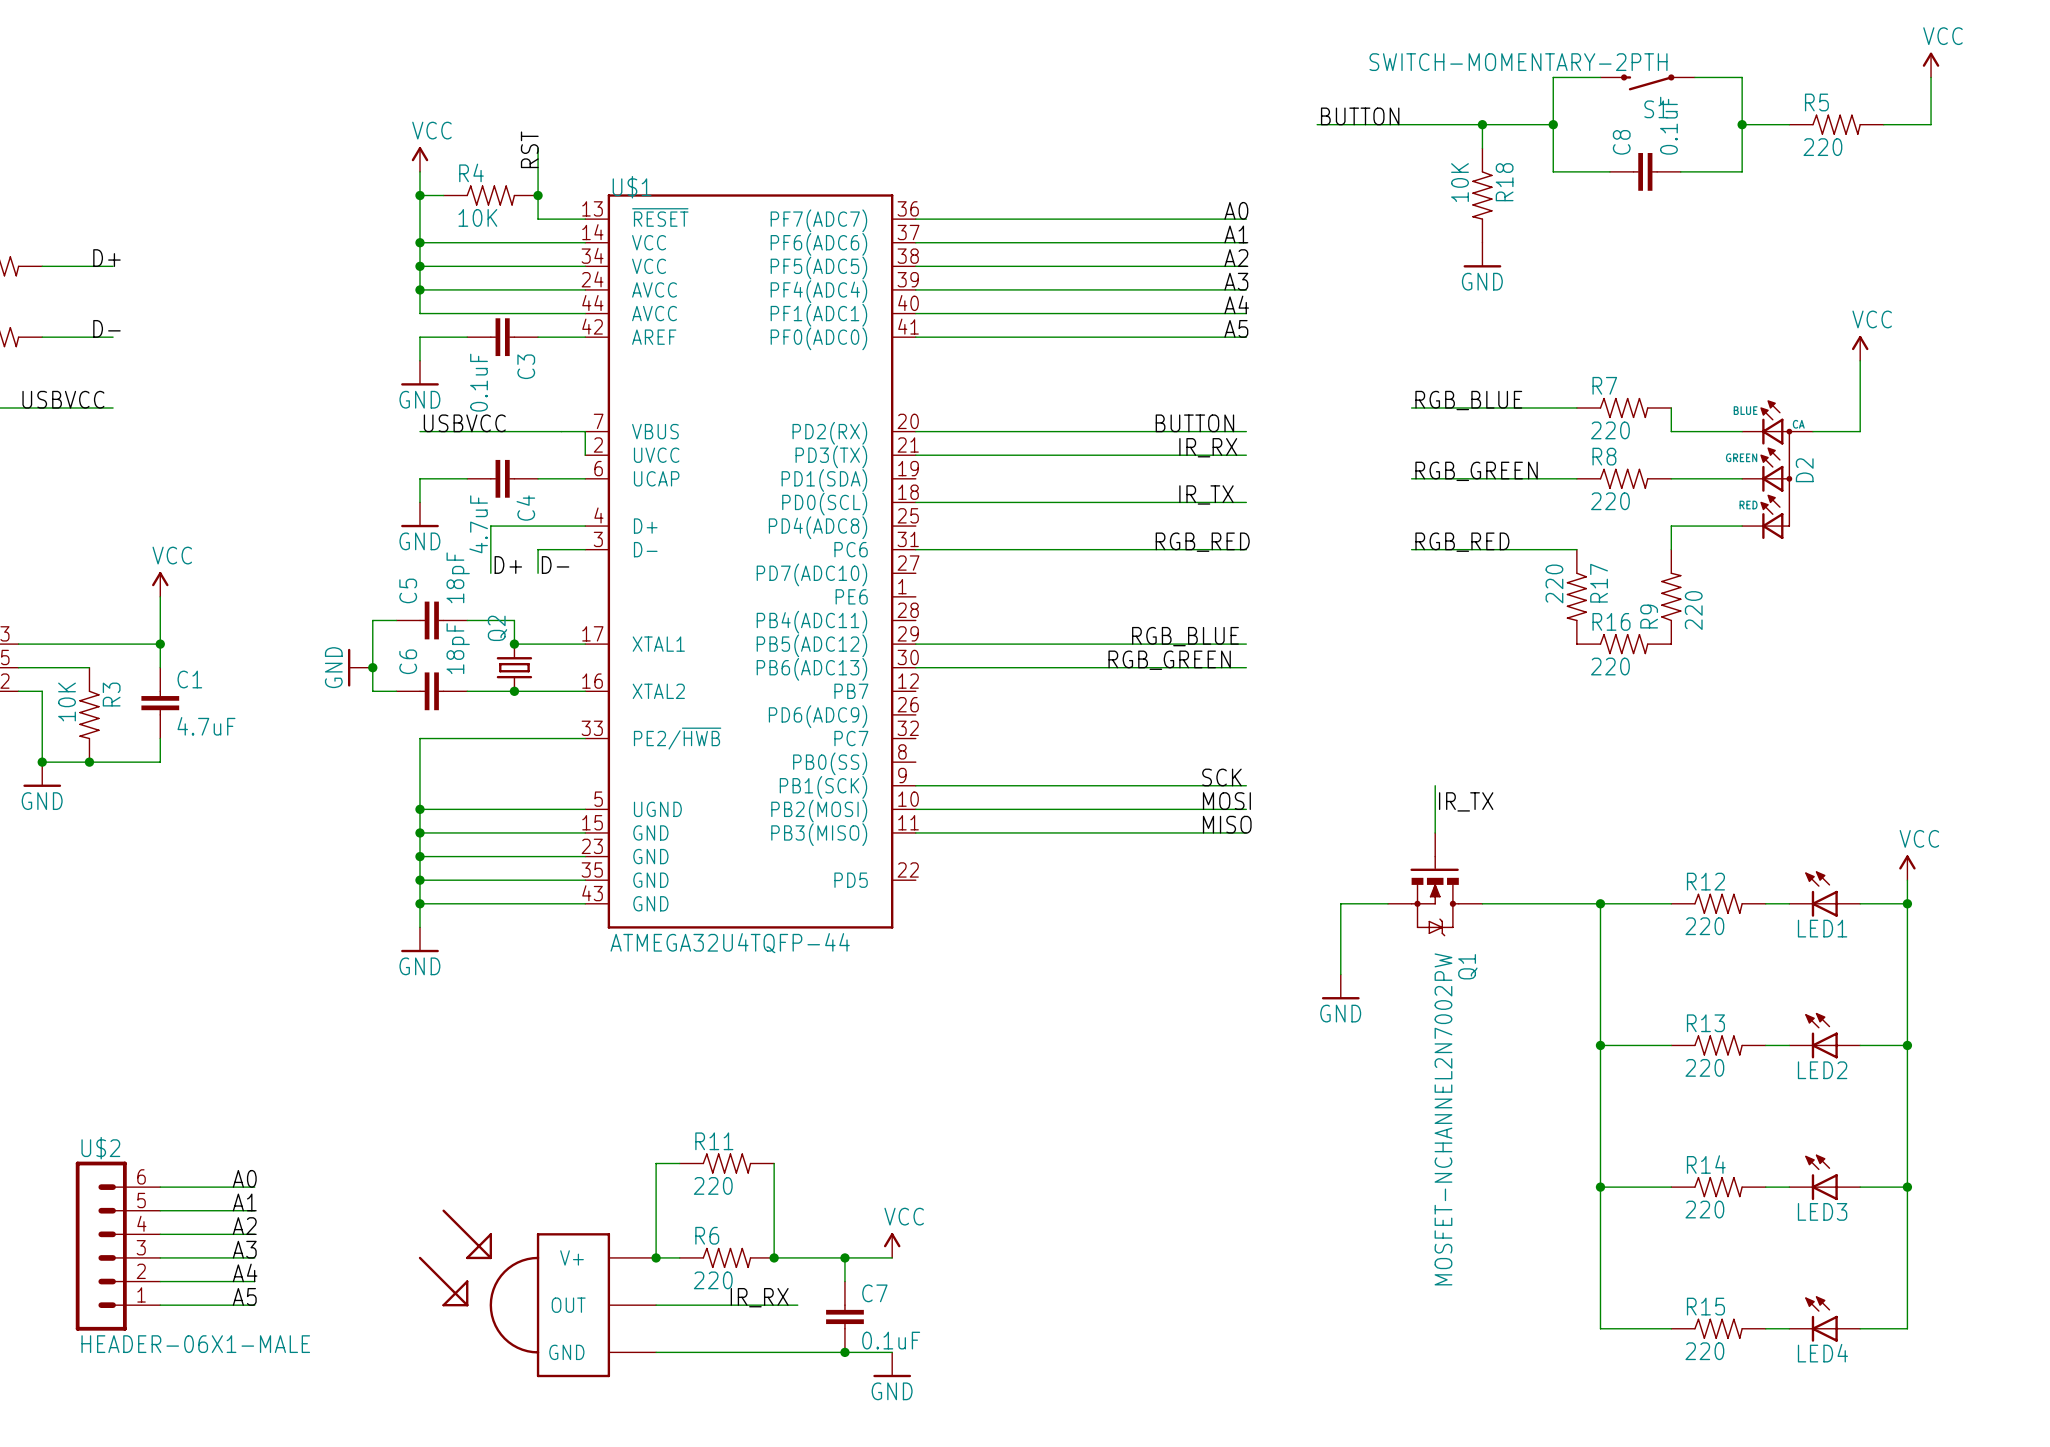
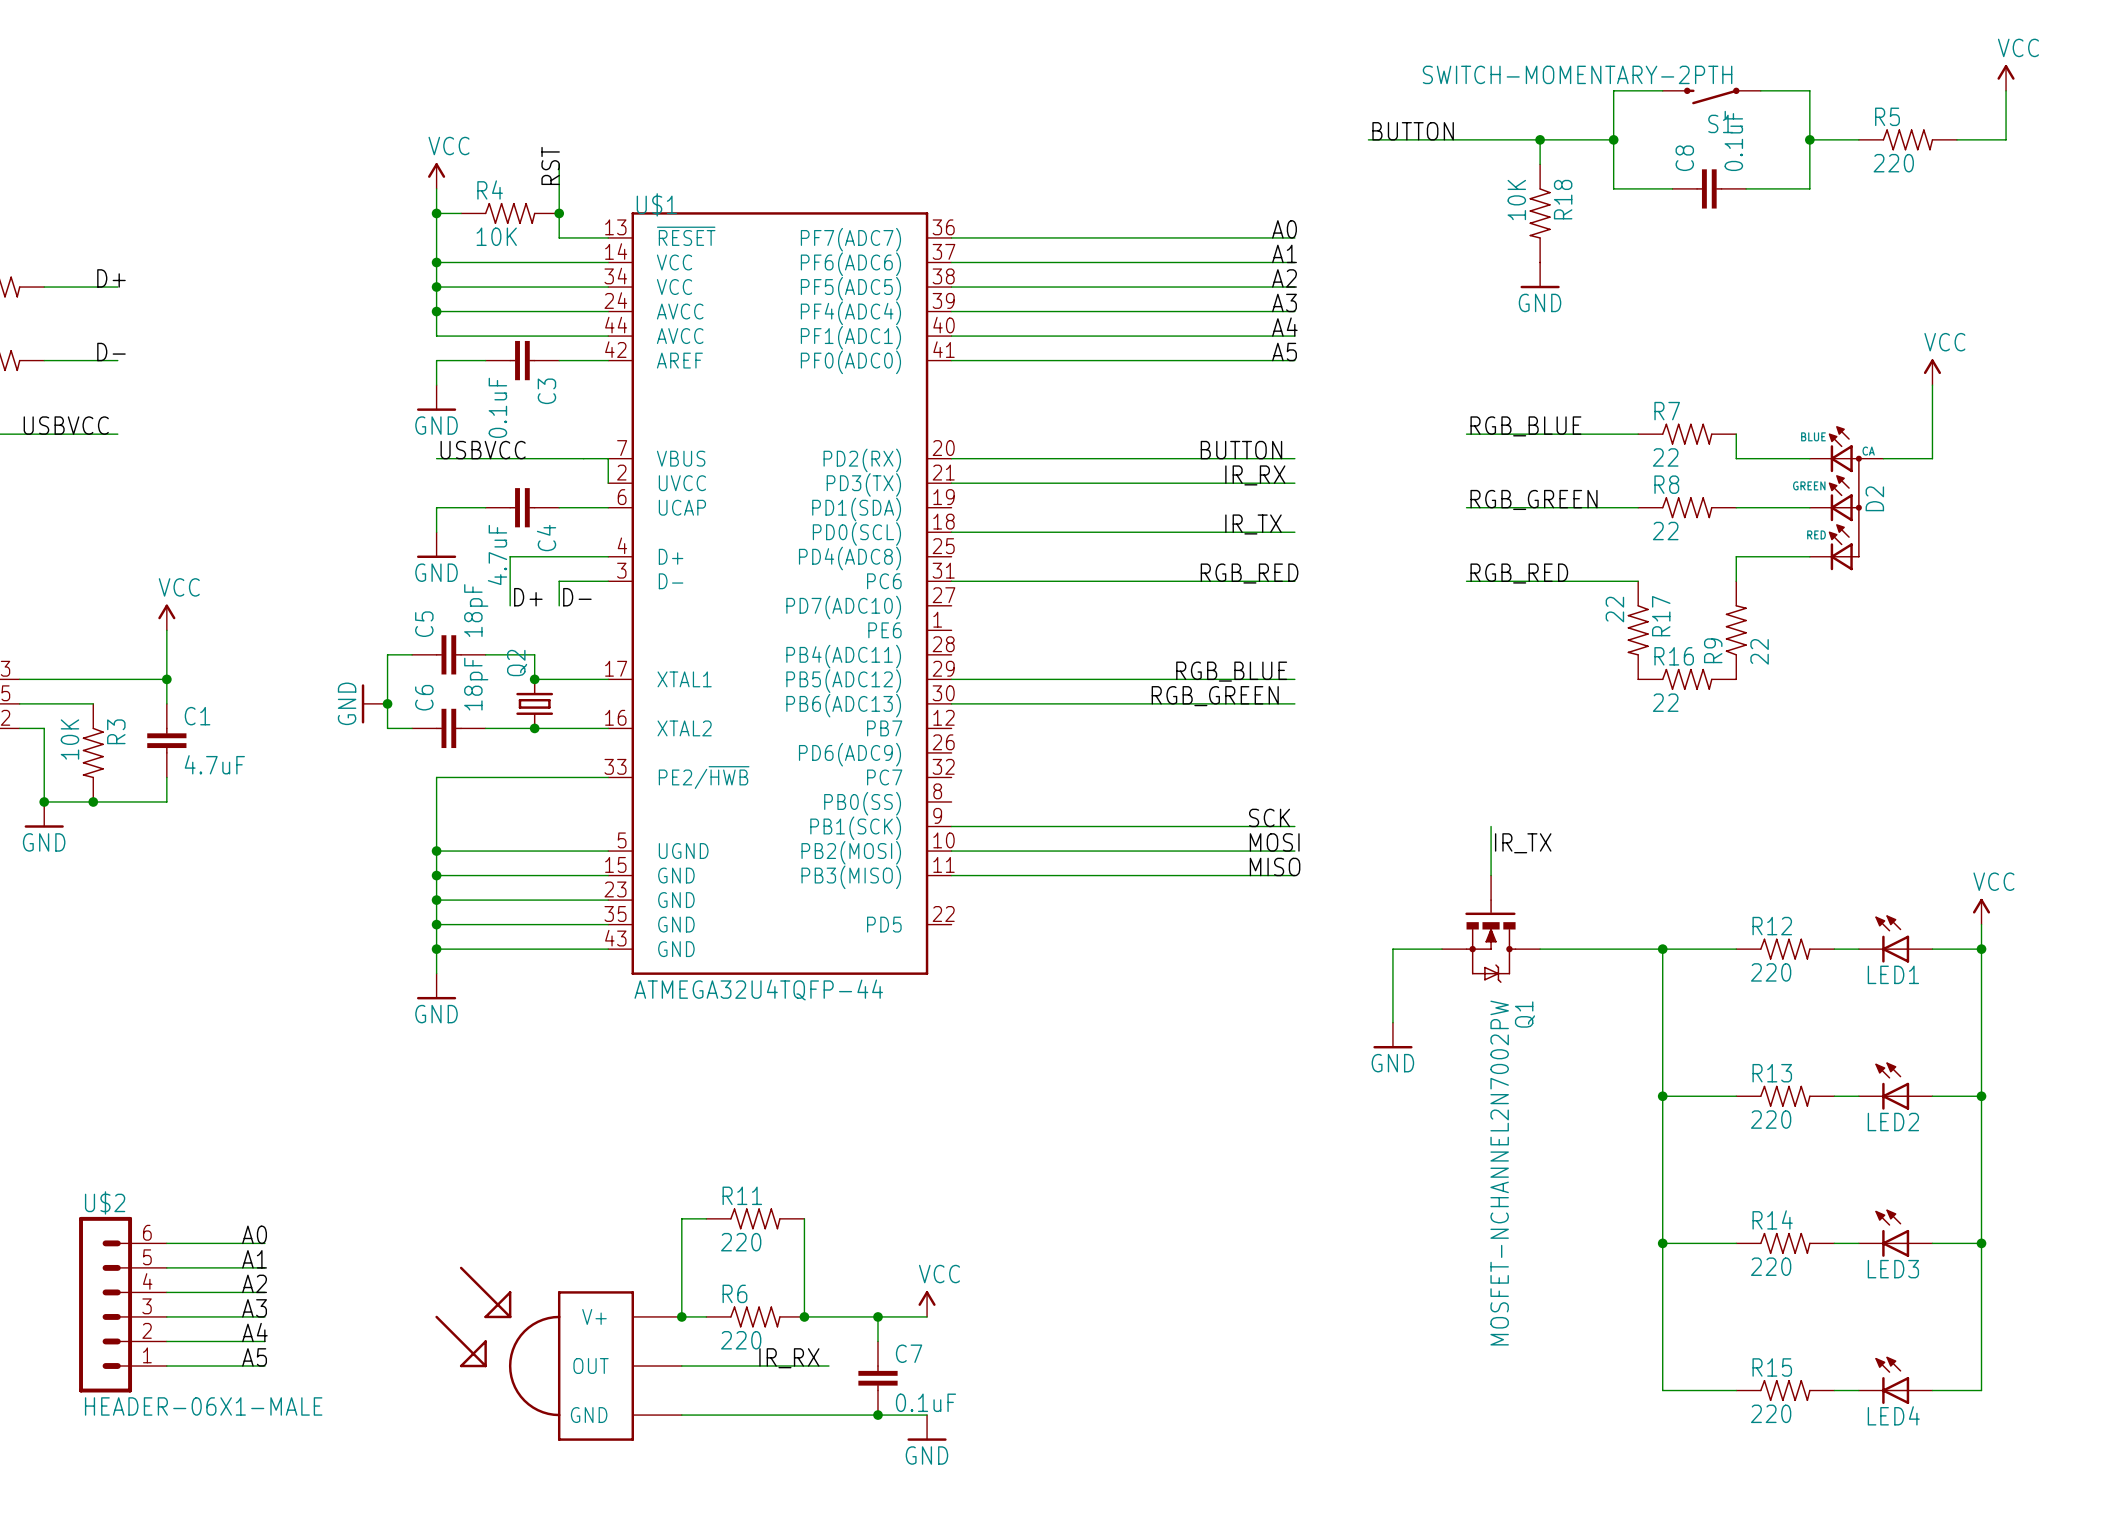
R7 value: 220 (1610, 430) -> 22 (1665, 457)
R8 value: 220 (1610, 501) -> 22 (1665, 531)
R17 value: 220 (1554, 583) -> 22 (1614, 609)
R9 value: 220 (1693, 610) -> 22 (1759, 651)
R16 value: 220 (1610, 666) -> 22 (1665, 702)

